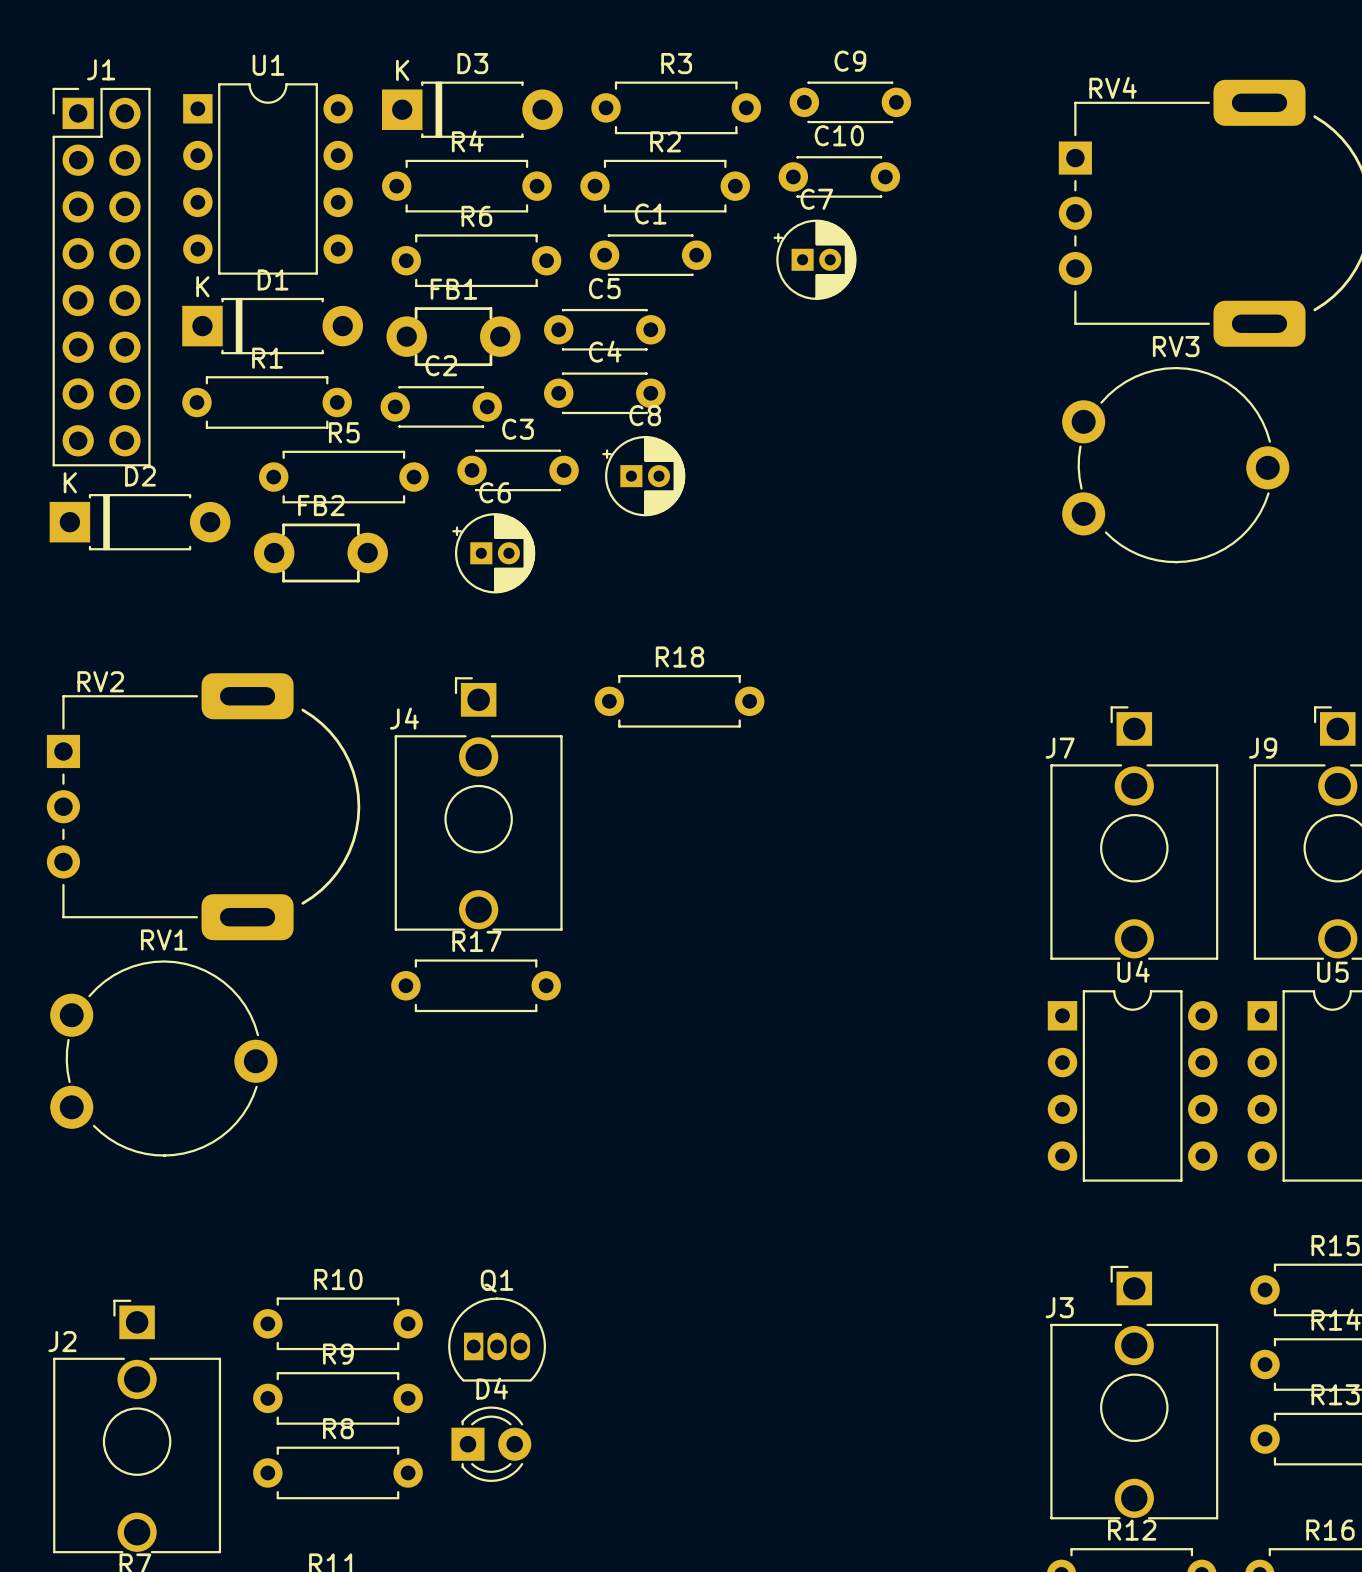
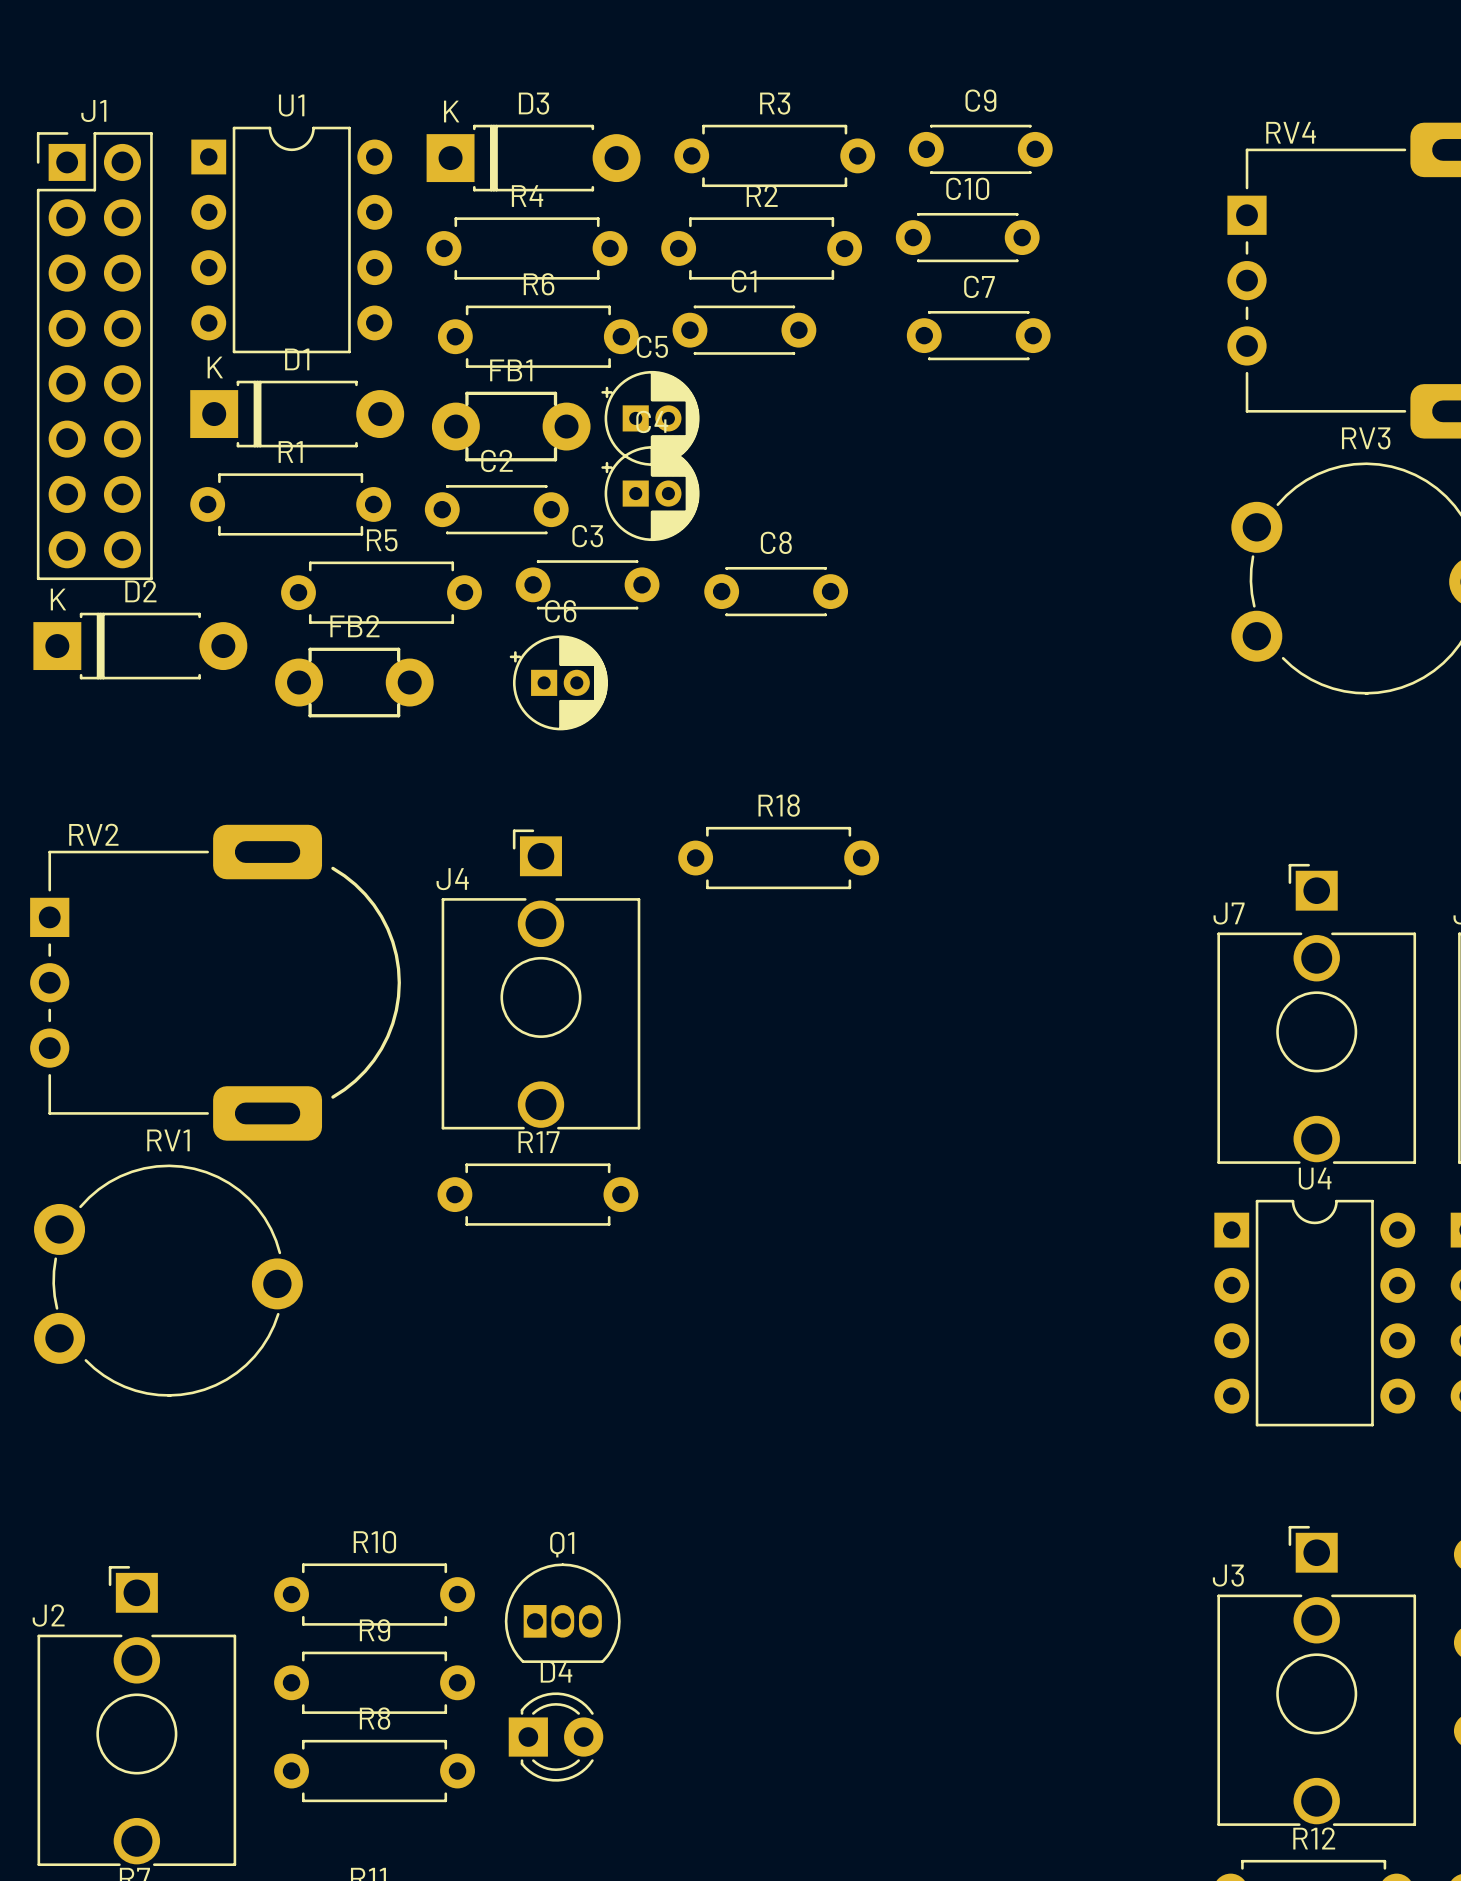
C7 footprint: [773, 219, 857, 300] -> [906, 311, 1051, 361]
C5 footprint: [544, 308, 666, 351] -> [601, 370, 700, 466]
C4 footprint: [544, 372, 666, 415] -> [601, 446, 700, 542]
C8 footprint: [602, 435, 686, 517] -> [704, 566, 849, 617]

